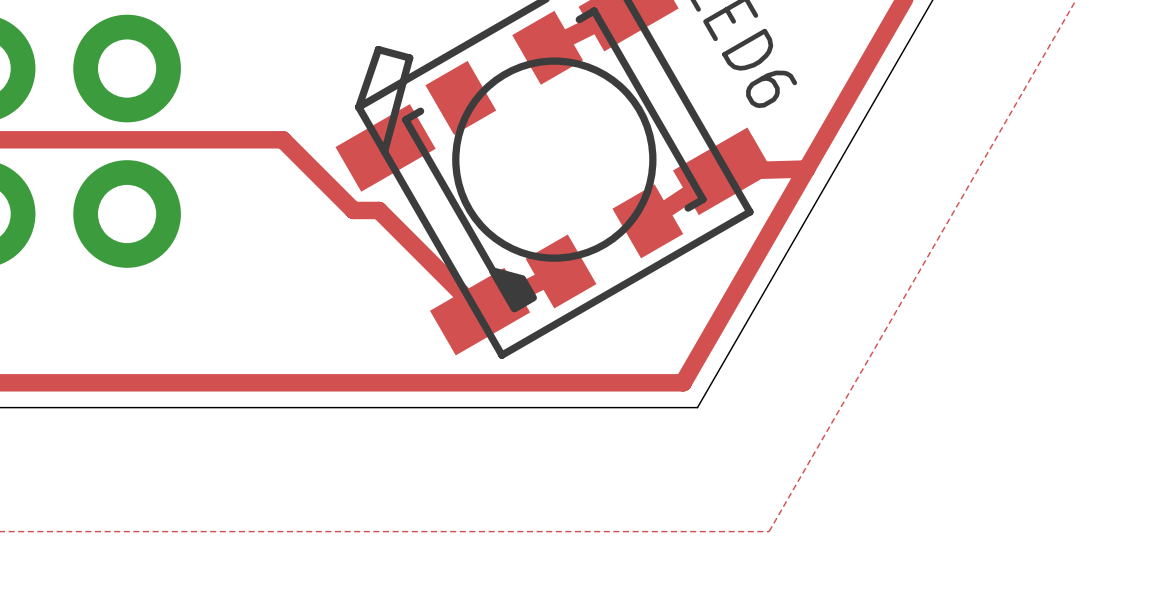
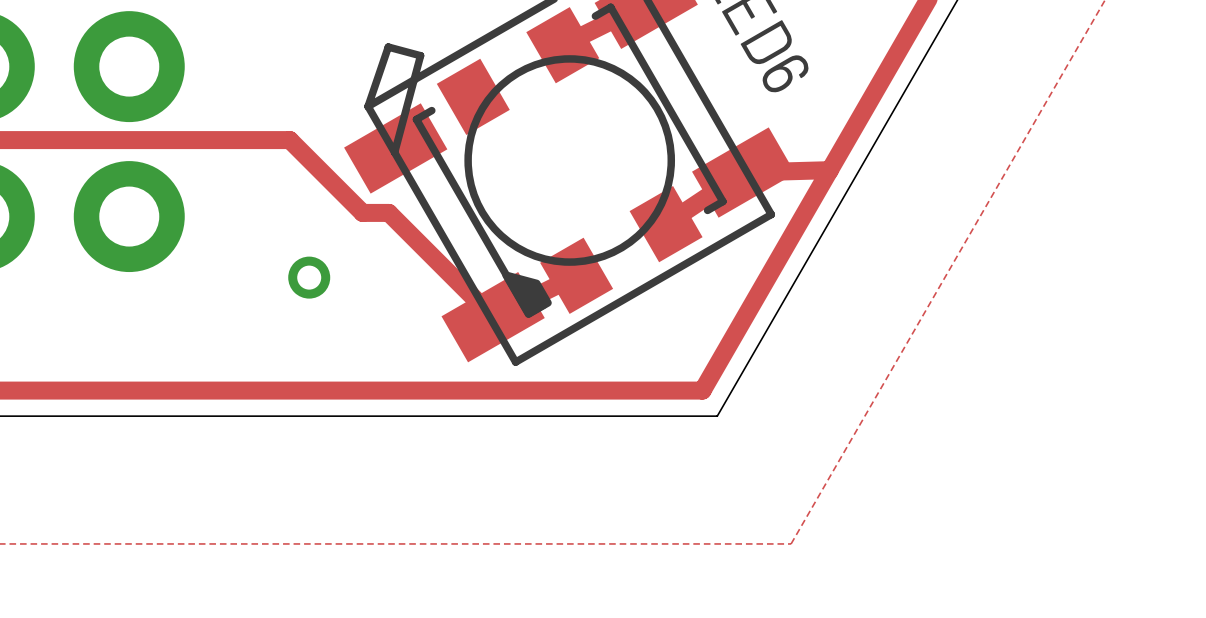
via: none -> (309, 277)

